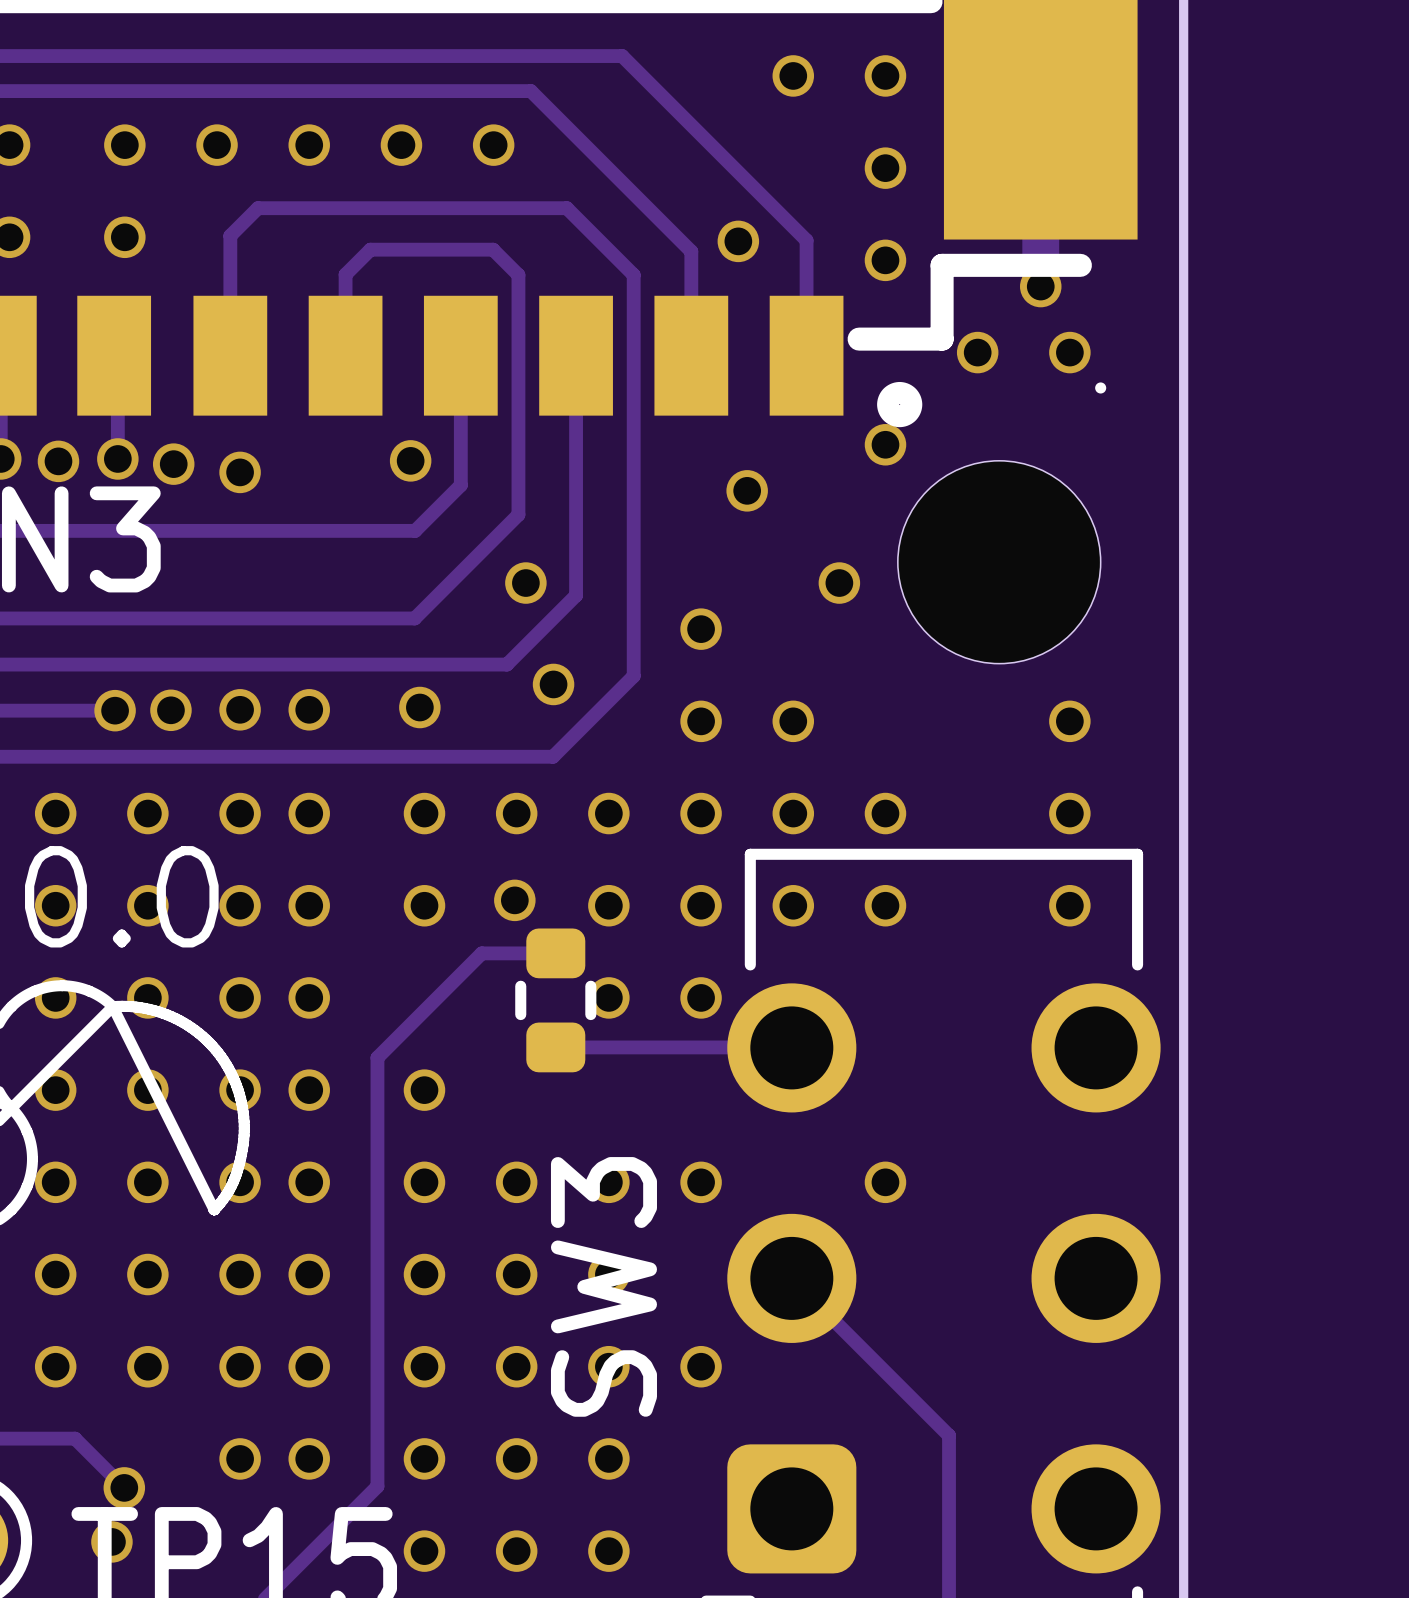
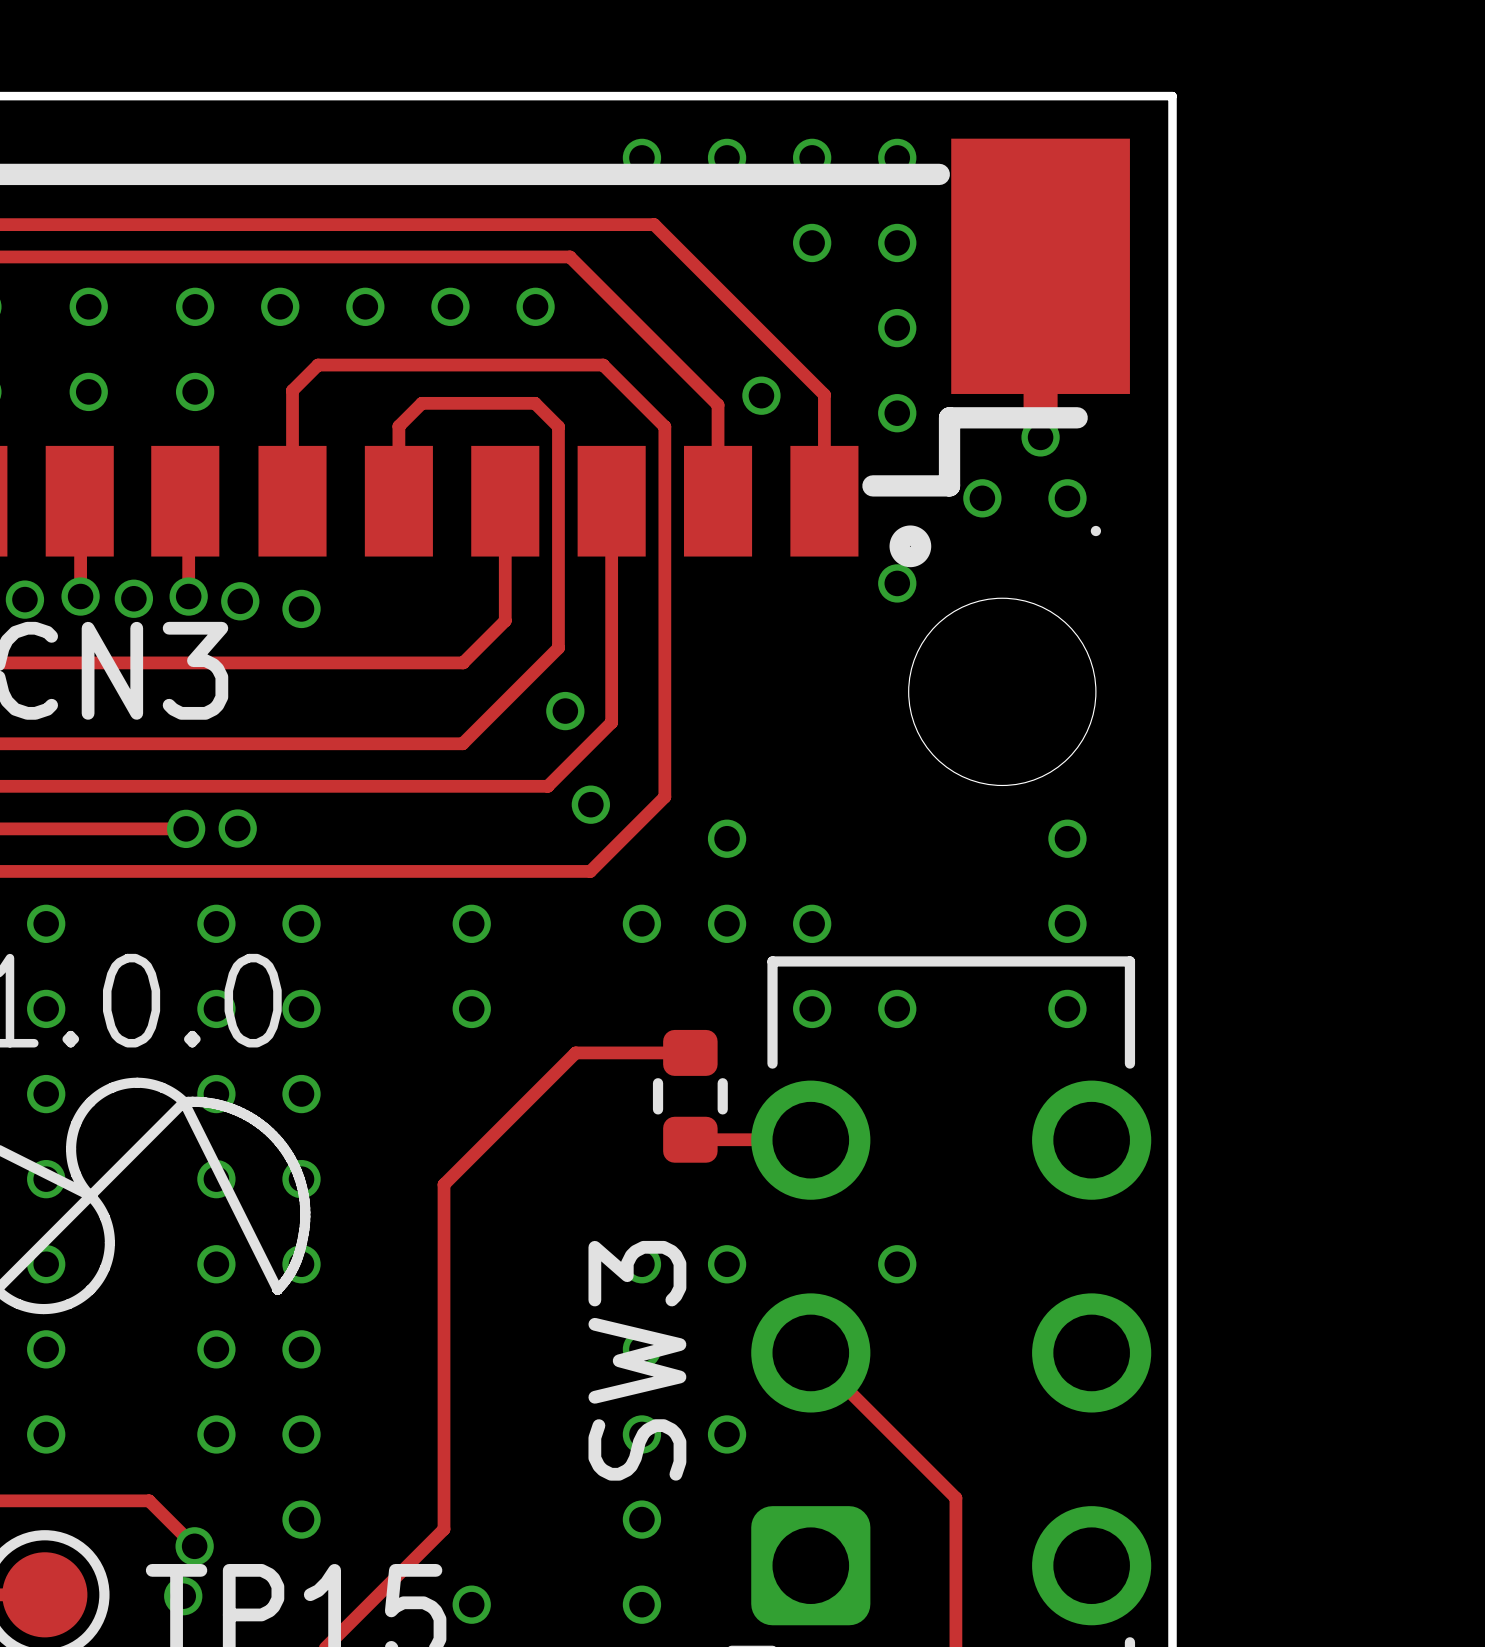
via: (410, 460) -> none
via: (747, 490) -> none
via: (839, 583) -> none
via: (701, 629) -> none
via: (419, 707) -> none
via: (240, 709) -> none
via: (309, 709) -> none
via: (793, 721) -> none
via: (55, 813) -> none
via: (309, 813) -> none
via: (516, 813) -> none
via: (885, 813) -> none
via: (514, 900) -> none
via: (55, 905) -> none
via: (309, 905) -> none
via: (608, 905) -> none
via: (701, 905) -> none
track: (537, 953) (481, 953) (377, 1057) (377, 1486) -> (575, 1052) (444, 1184) (444, 1529) (428, 1544)
via: (55, 997) -> none
via: (309, 997) -> none
via: (608, 997) -> none
via: (701, 997) -> none
part position: (555, 1000) -> (690, 1096)
track: (555, 1047) (661, 1047) -> (592, 1052) (690, 1052)
via: (55, 1090) -> none
via: (309, 1090) -> none
via: (424, 1090) -> none
via: (55, 1182) -> none
via: (309, 1182) -> none
via: (424, 1182) -> none
via: (516, 1182) -> none
via: (55, 1274) -> none
via: (309, 1274) -> none
via: (424, 1274) -> none
via: (516, 1274) -> none
via: (55, 1366) -> none
via: (309, 1366) -> none
via: (424, 1366) -> none
via: (516, 1366) -> none
via: (309, 1458) -> none
via: (424, 1458) -> none
via: (516, 1458) -> none
via: (516, 1551) -> none

